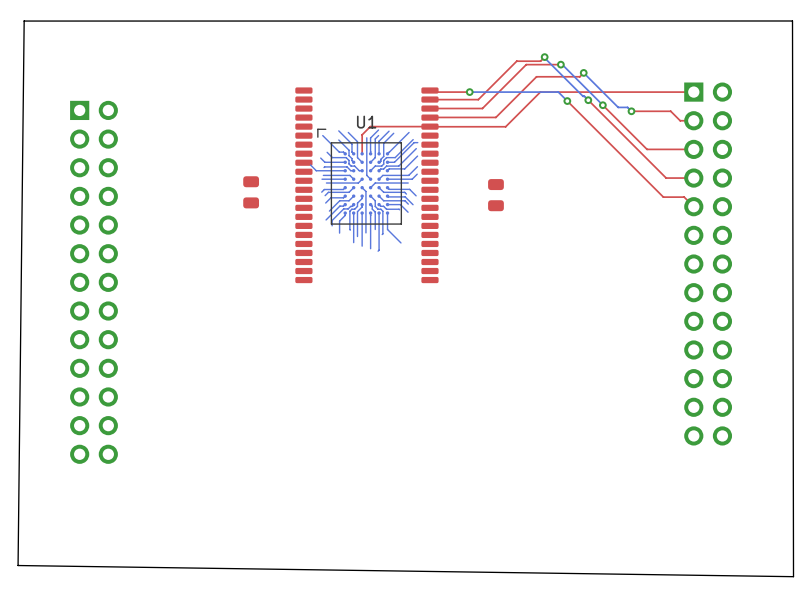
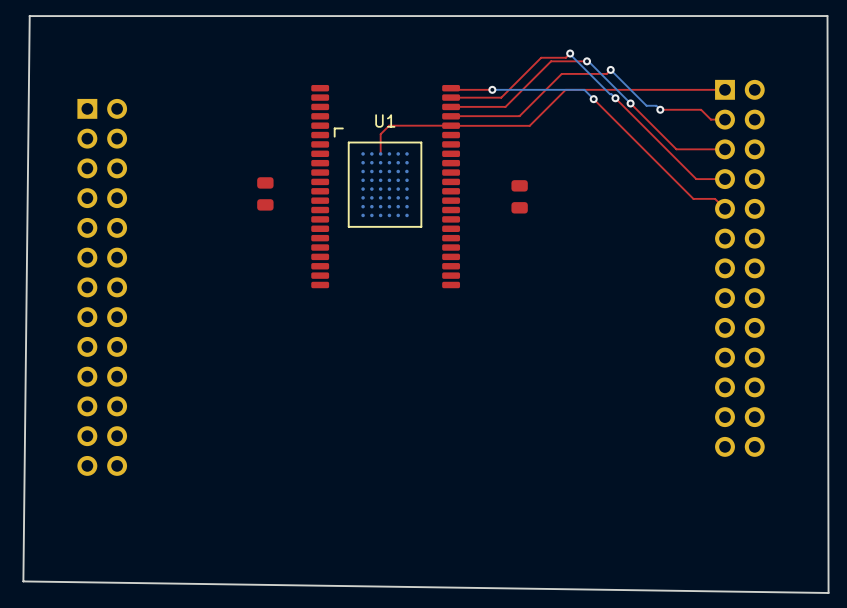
bottom track: (338, 130) (351, 144) (353, 153) -> none
bottom track: (378, 130) (370, 137) (370, 153) -> none
bottom track: (389, 131) (379, 141) (379, 153) -> none
bottom track: (348, 132) (357, 141) (357, 157) (362, 162) -> none
bottom track: (409, 132) (389, 152) -> none
bottom track: (393, 133) (383, 143) (383, 156) (379, 162) -> none
bottom track: (322, 135) (339, 152) (345, 153) -> none
bottom track: (378, 135) (375, 138) (375, 157) (370, 162) -> none
bottom track: (366, 137) (366, 175) (370, 179) -> none
bottom track: (413, 139) (395, 157) (386, 157) (381, 166) (375, 166) (370, 170) -> none
bottom track: (338, 140) (349, 150) (349, 155) (353, 162) -> none
bottom track: (417, 142) (414, 142) (394, 162) (387, 162) -> none
bottom track: (416, 148) (398, 166) (386, 166) (379, 170) -> none
bottom track: (327, 152) (332, 157) (346, 157) (351, 166) (362, 170) -> none
bottom track: (389, 152) (387, 153) -> none
bottom track: (417, 156) (404, 168) (389, 168) (387, 170) -> none
bottom track: (320, 158) (324, 162) (345, 162) -> none
bottom track: (310, 165) (316, 170) (345, 170) -> none
bottom track: (417, 166) (408, 175) (382, 175) (379, 179) -> none
bottom track: (324, 167) (347, 166) (353, 170) -> none
bottom track: (417, 174) (412, 179) (387, 179) -> none
bottom track: (323, 175) (349, 175) (353, 179) -> none
bottom track: (345, 179) (322, 179) -> none
bottom track: (362, 179) (358, 183) (326, 183) -> none
bottom track: (408, 183) (375, 183) (370, 187) -> none
bottom track: (345, 187) (343, 189) (324, 189) (321, 192) -> none
bottom track: (353, 187) (349, 192) (328, 192) (325, 195) -> none
bottom track: (362, 187) (365, 191) (365, 232) -> none
bottom track: (379, 187) (383, 192) (404, 192) (406, 194) -> none
bottom track: (387, 187) (389, 189) (409, 189) (416, 195) -> none
bottom track: (345, 196) (330, 197) (325, 203) -> none
bottom track: (353, 196) (349, 200) (339, 200) (329, 211) -> none
bottom track: (362, 196) (357, 206) (349, 211) (350, 230) -> none
bottom track: (370, 196) (375, 200) (375, 206) (382, 211) (382, 234) -> none
bottom track: (379, 196) (383, 200) (404, 200) (408, 204) -> none
bottom track: (387, 196) (405, 196) (413, 204) -> none
bottom track: (345, 204) (339, 206) (326, 219) -> none
bottom track: (353, 204) (348, 208) (343, 208) (332, 220) (332, 225) -> none
bottom track: (362, 204) (357, 211) (357, 236) -> none
bottom track: (370, 204) (375, 212) (375, 229) -> none
bottom track: (379, 204) (386, 209) (399, 209) -> none
bottom track: (387, 204) (400, 204) (408, 212) -> none
bottom track: (345, 213) (339, 221) (339, 233) -> none
bottom track: (353, 213) (353, 242) -> none
bottom track: (362, 213) (362, 246) -> none
bottom track: (379, 213) (378, 251) -> none
bottom track: (387, 213) (387, 229) (400, 242) -> none

